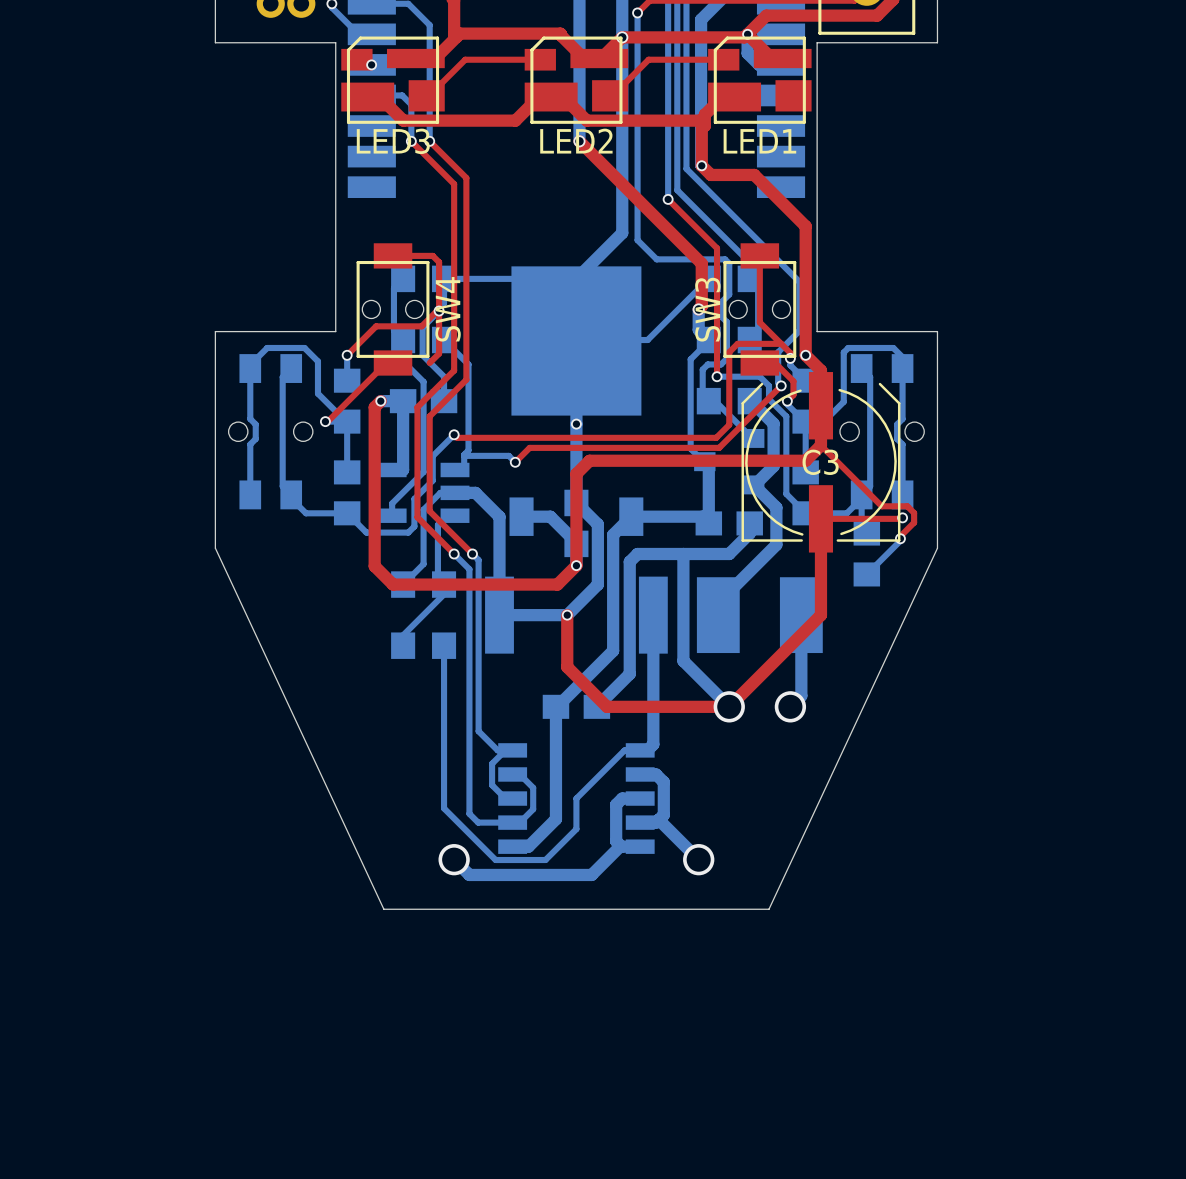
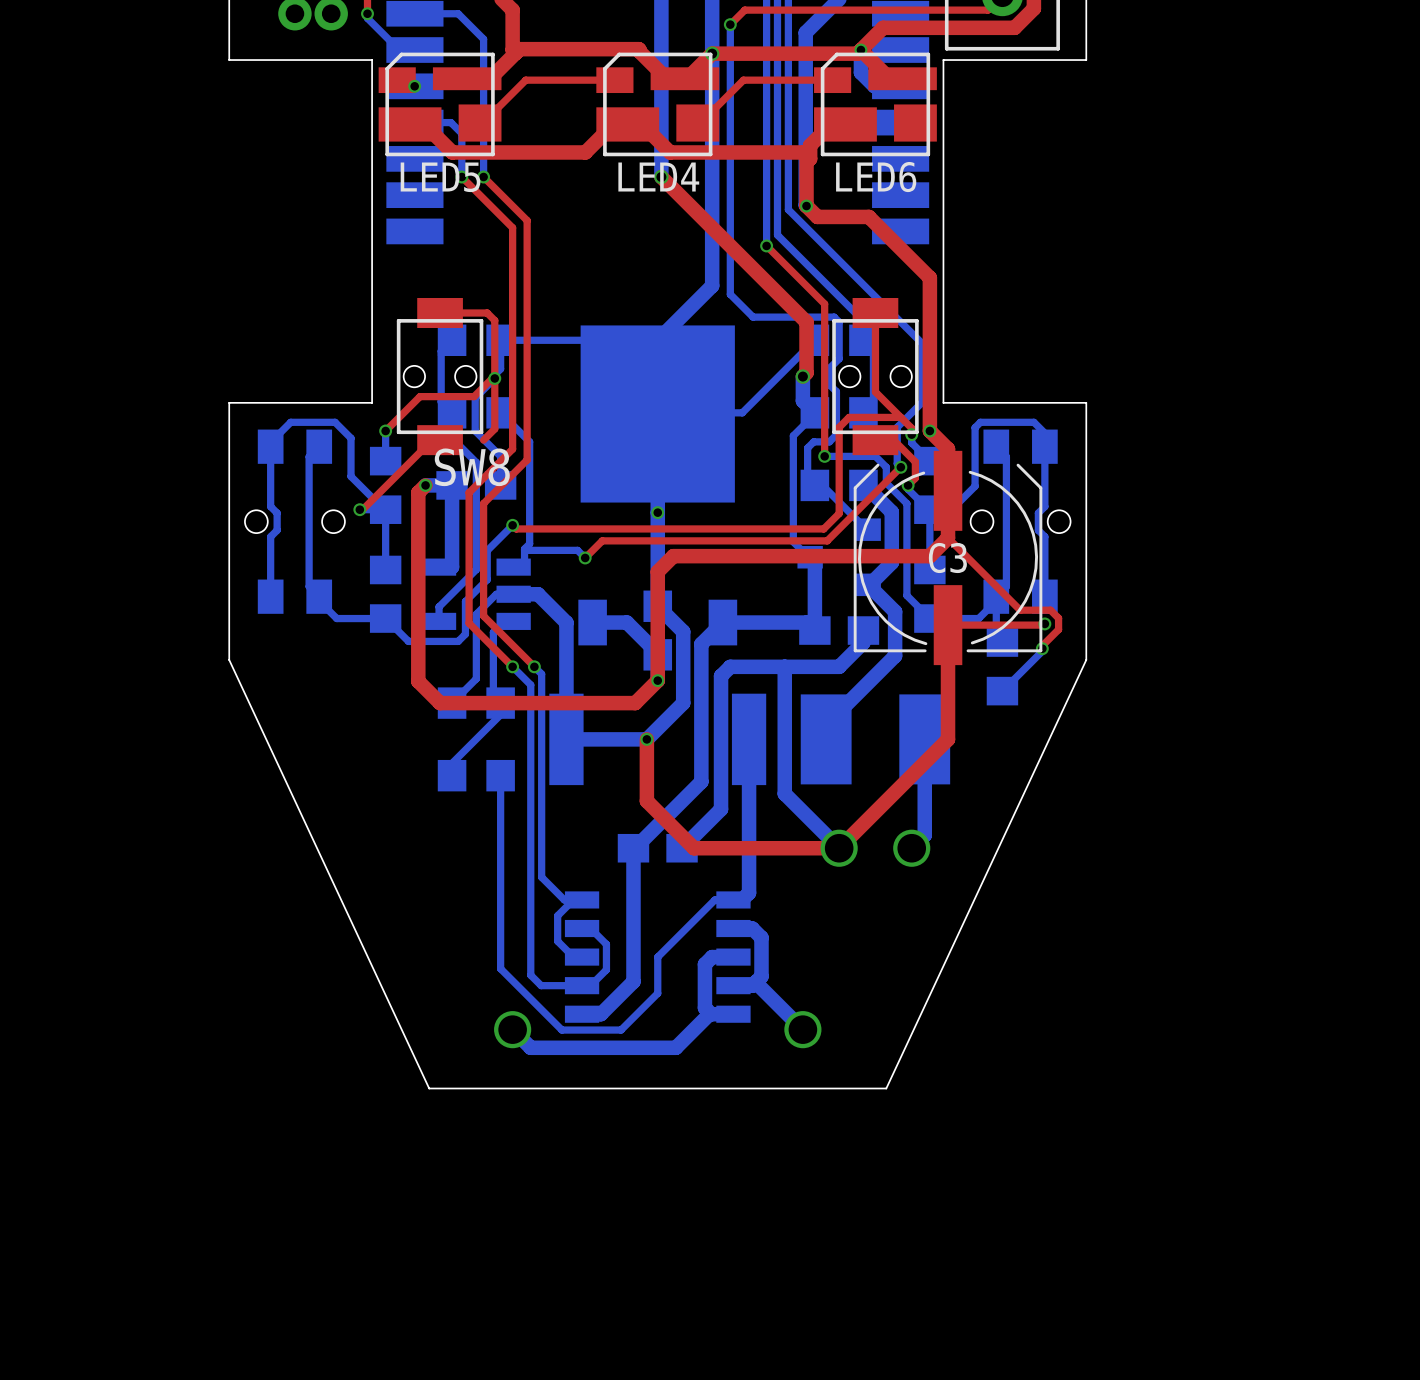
LED3 name: LED3 (393, 141) -> LED5 (440, 177)
LED2 name: LED2 (576, 141) -> LED4 (658, 177)
LED1 name: LED1 (759, 141) -> LED6 (876, 177)
SW4 name: SW4 (448, 309) -> SW8 (472, 467)
SW3 name: SW3 (707, 309) -> none

